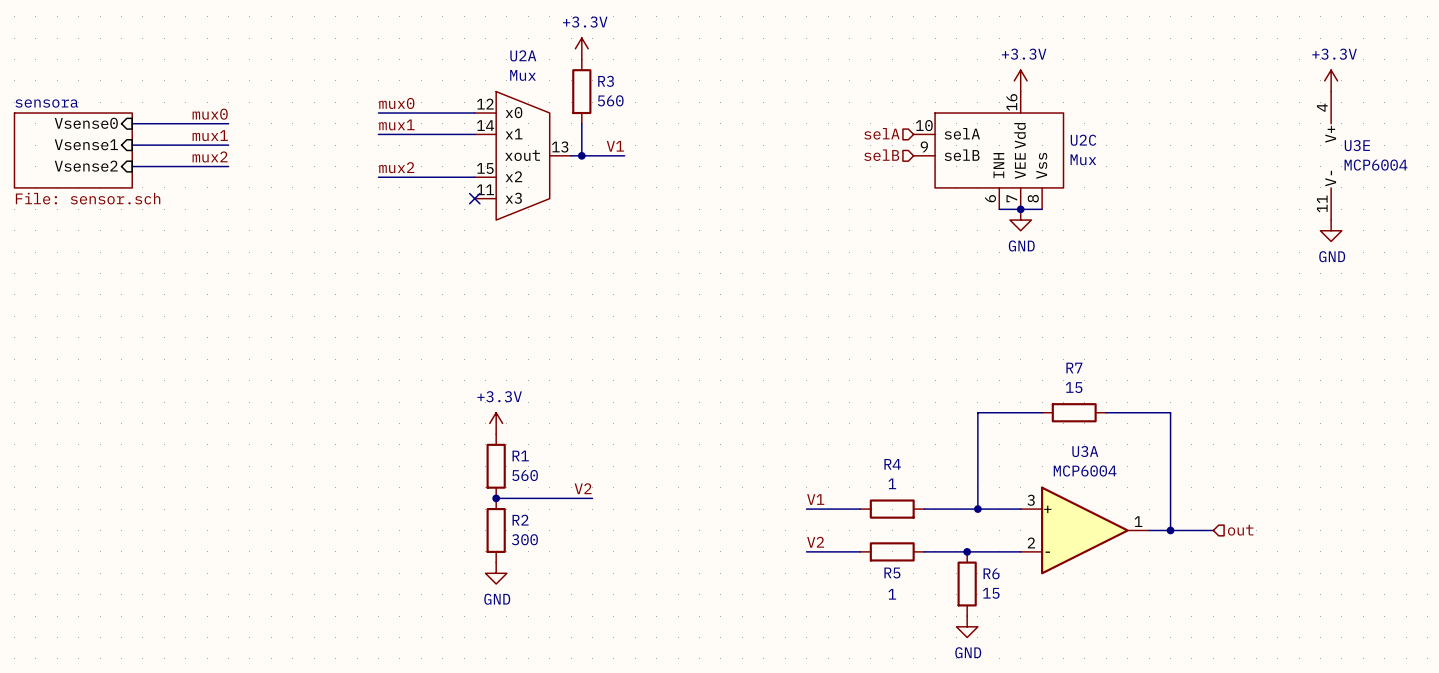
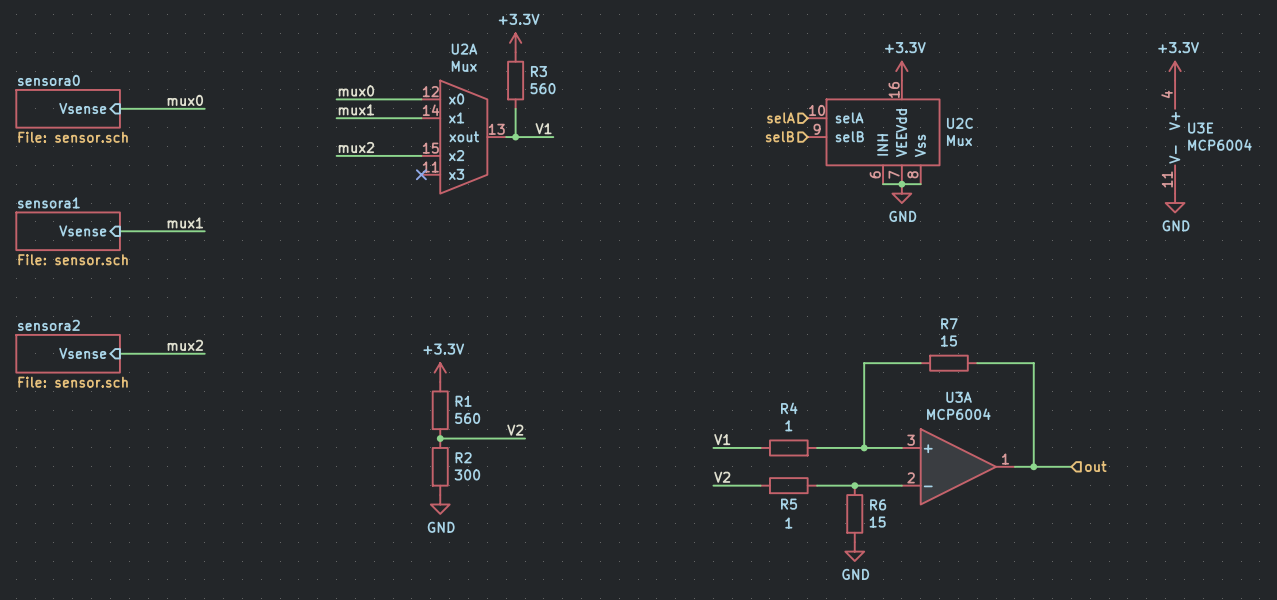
sheet sensora0: none -> File: sensor.sch (68, 108)
sheet pin: Vsense0 (86, 123) -> Vsense (82, 108)
label position: mux1 (210, 135) -> mux1 (185, 222)
sheet pin: Vsense1 (86, 144) -> none
wire: (132, 145) (228, 145) -> none
sheet sensora: File: sensor.sch (73, 150) -> none
label: mux2 (210, 156) -> none
sheet pin: Vsense2 (86, 166) -> none
wire: (132, 166) (228, 166) -> (119, 231) (204, 231)
sheet sensora1: none -> File: sensor.sch (68, 231)
sheet pin: none -> Vsense (82, 230)
label: none -> mux2 (185, 345)
sheet pin: none -> Vsense (82, 353)
sheet sensora2: none -> File: sensor.sch (68, 353)
wire: none -> (119, 353) (204, 353)

